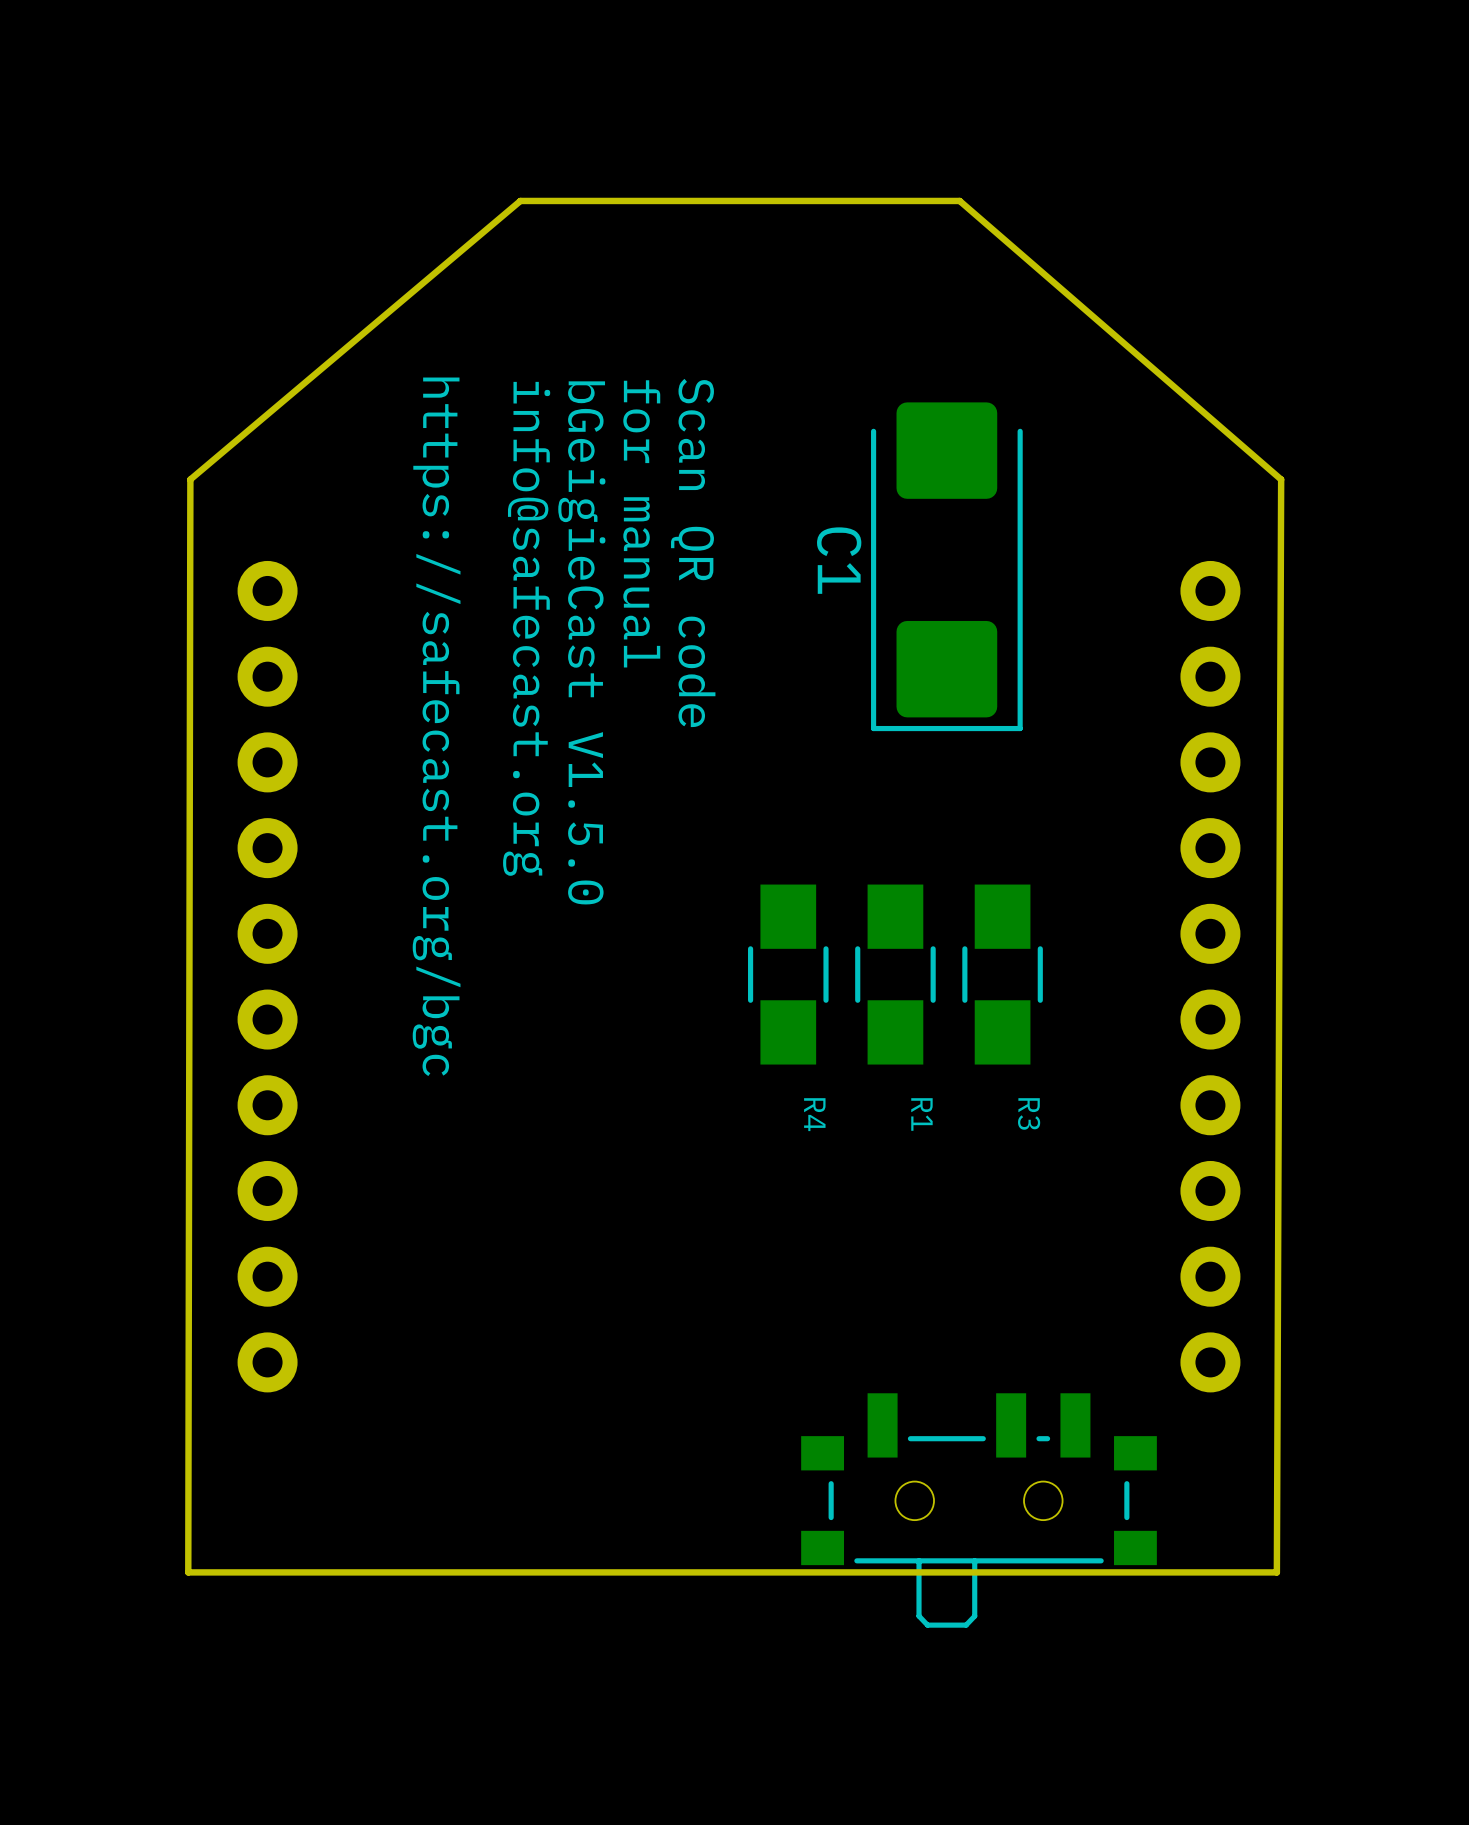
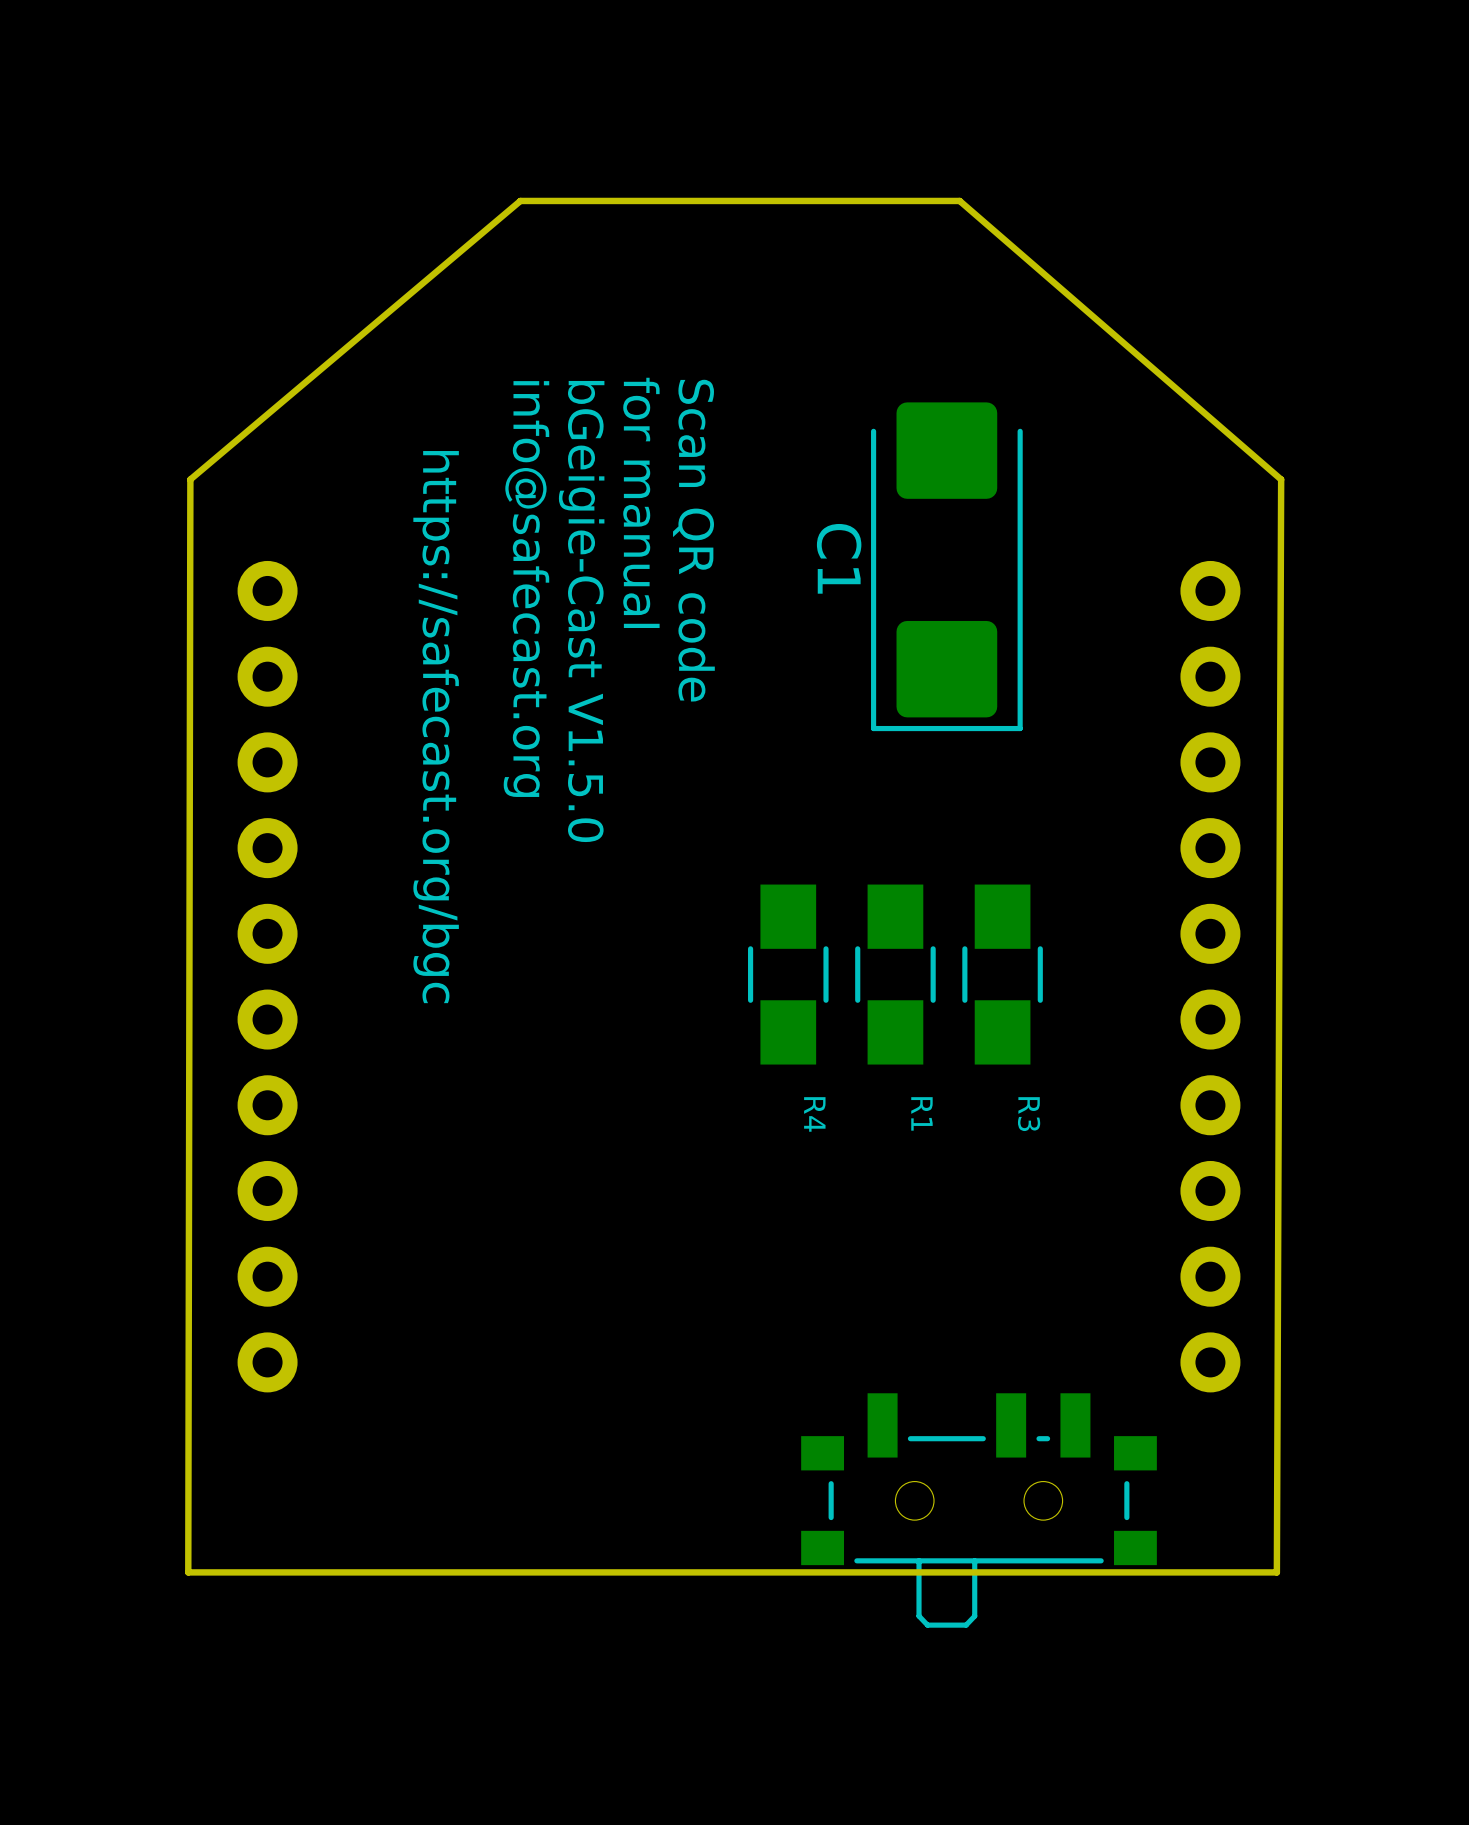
text: bGeigieCast V1.5.0 (581, 642) -> bGeigie-Cast V1.5.0 (581, 611)

